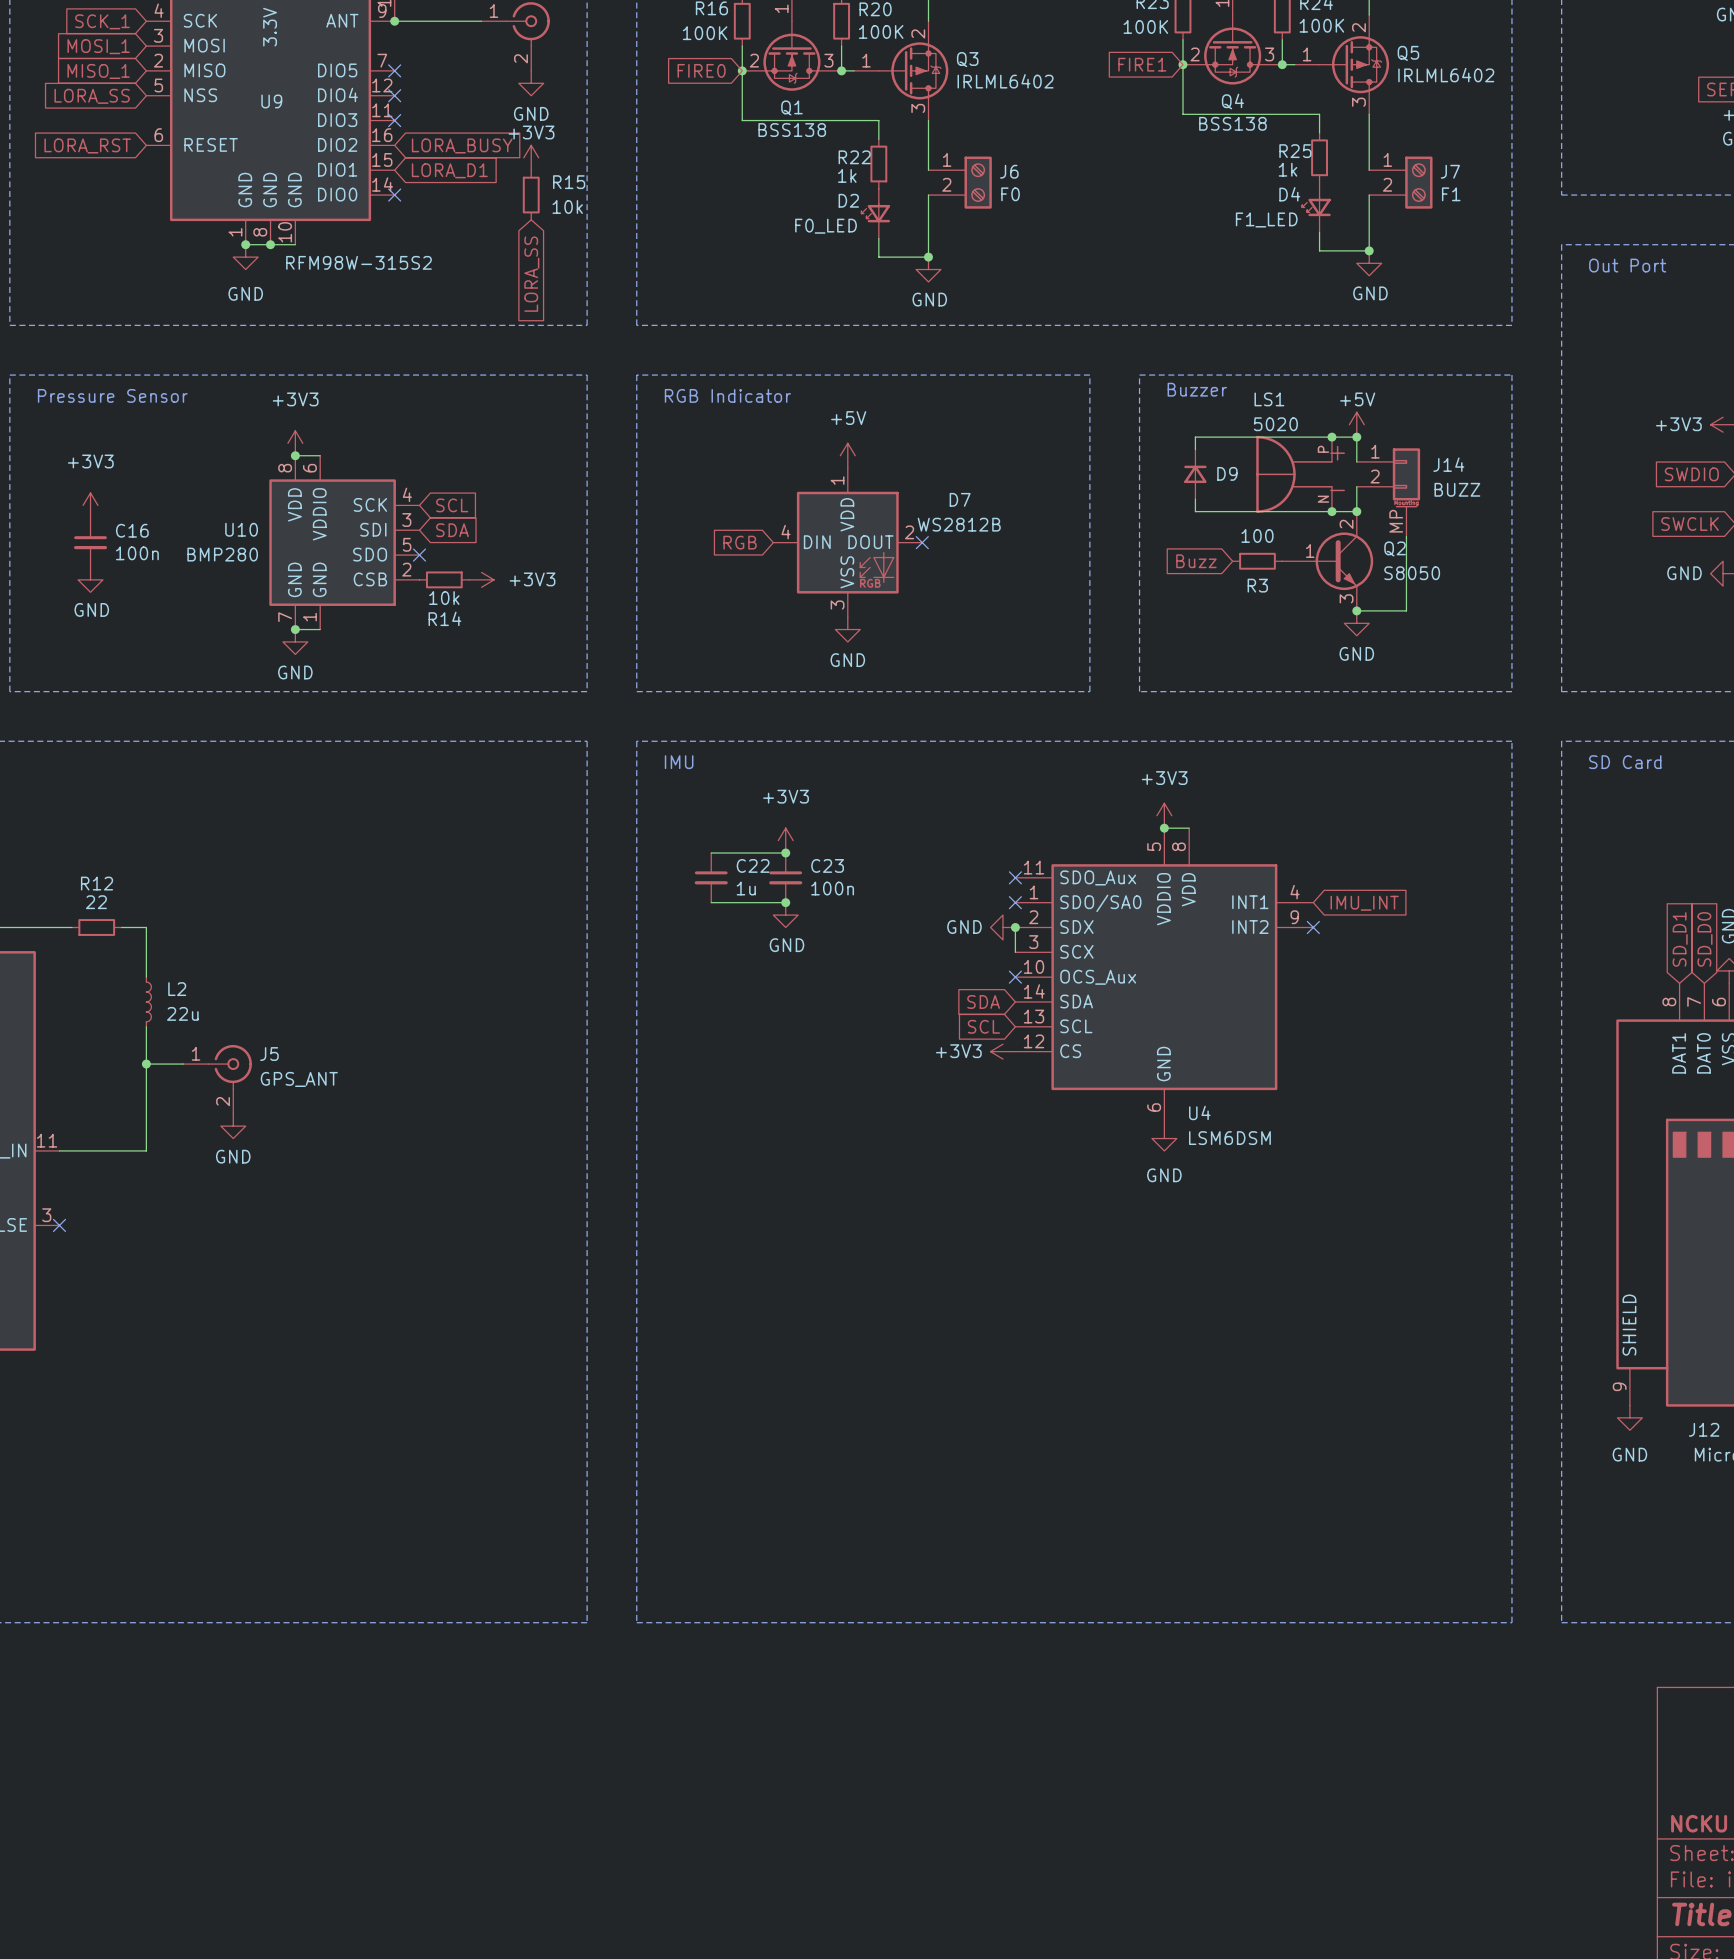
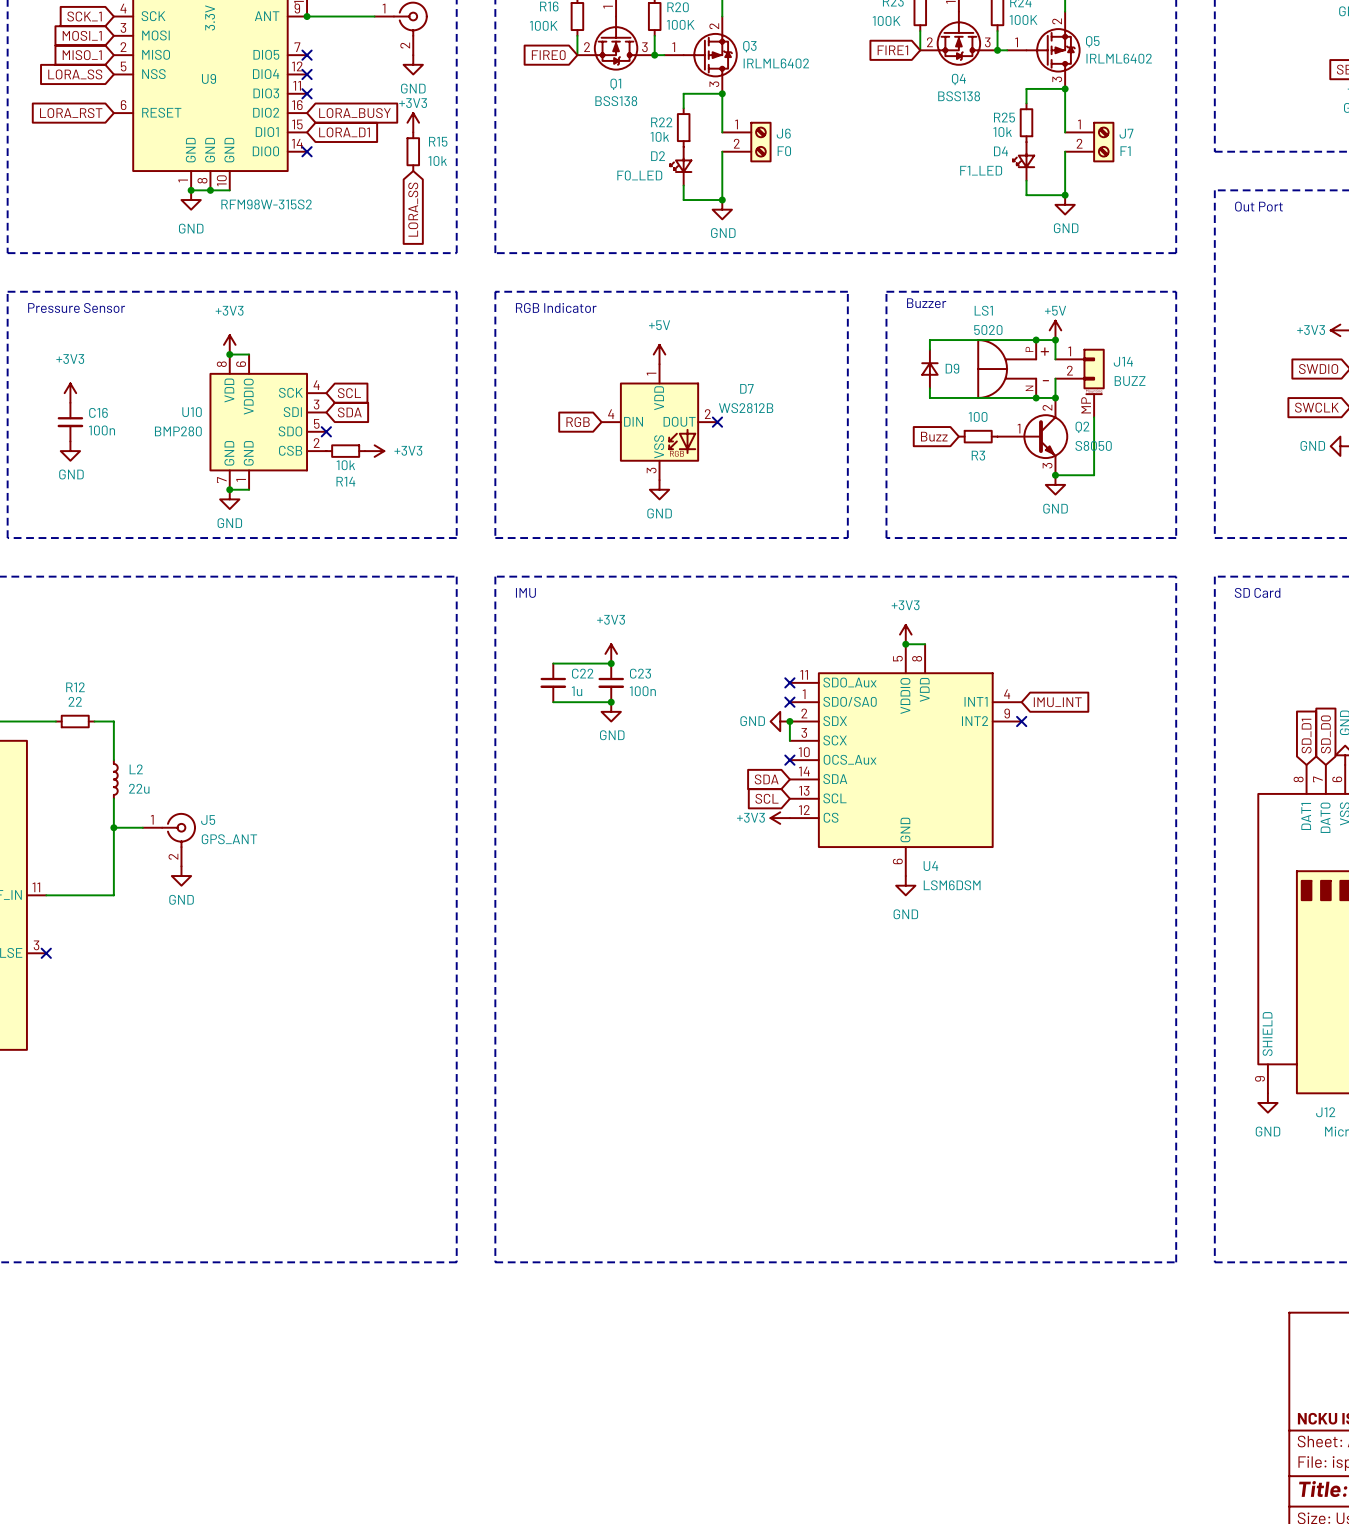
wire: (1182, 64) (1182, 114) (1319, 114) -> (1065, 88) (1026, 88)
junction: (1182, 64) -> none
wire: (742, 70) (742, 120) (878, 120) -> (722, 93) (683, 93)
junction: (742, 70) -> none
junction: none -> (1065, 88)
junction: none -> (722, 93)
R25 value: 1k (1288, 169) -> 10k (1002, 132)
R22 value: 1k (847, 175) -> 10k (659, 136)

